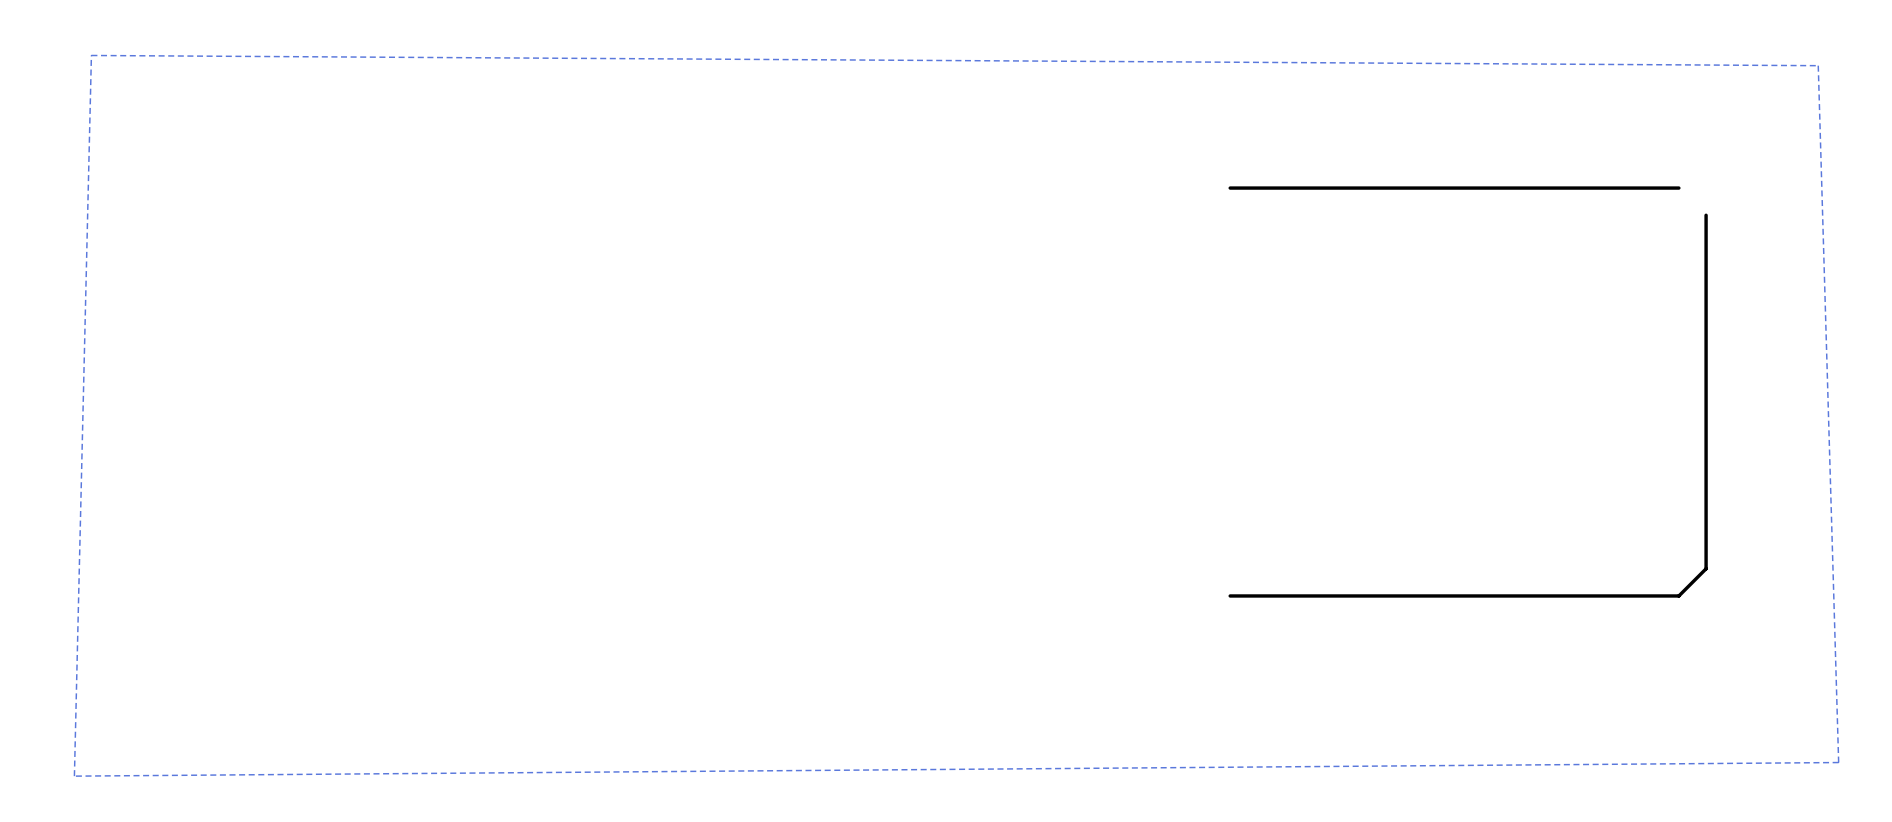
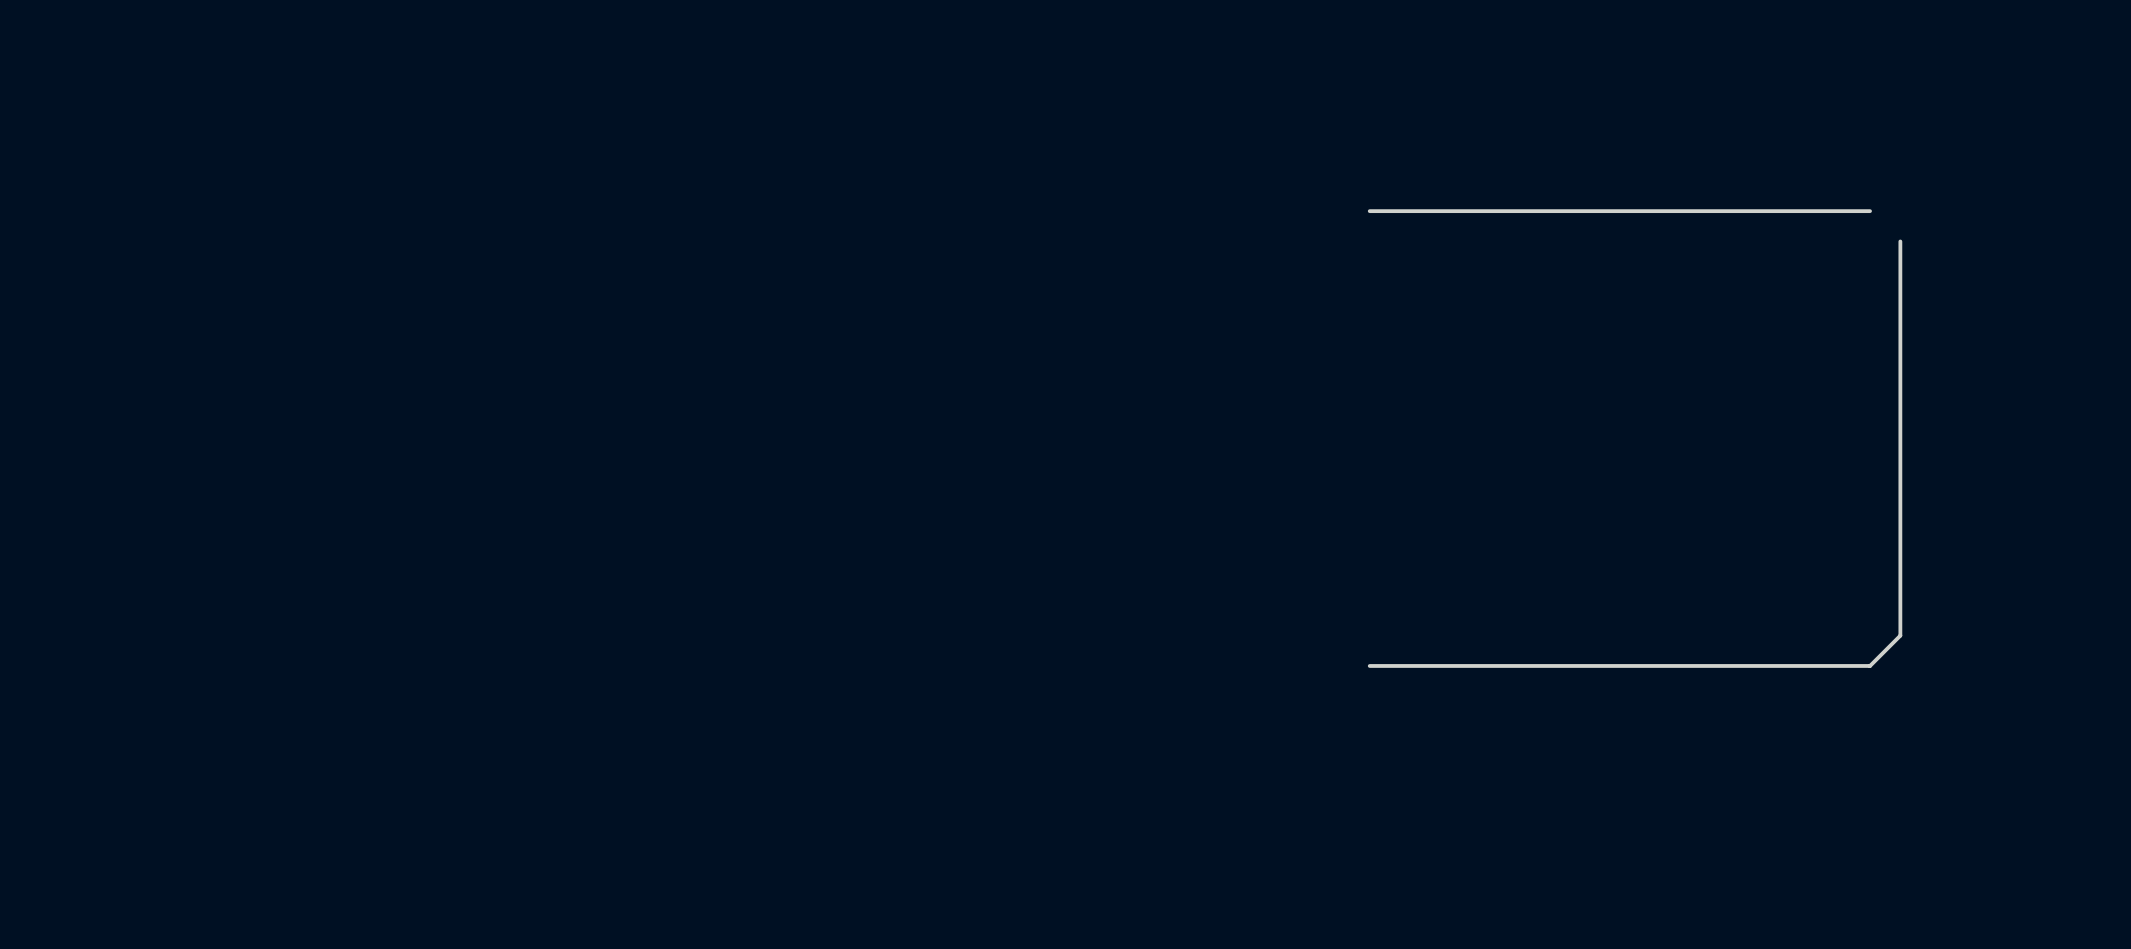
zone outline: (91, 55) (74, 776) (1838, 762) (1818, 65) (91, 55) -> none

